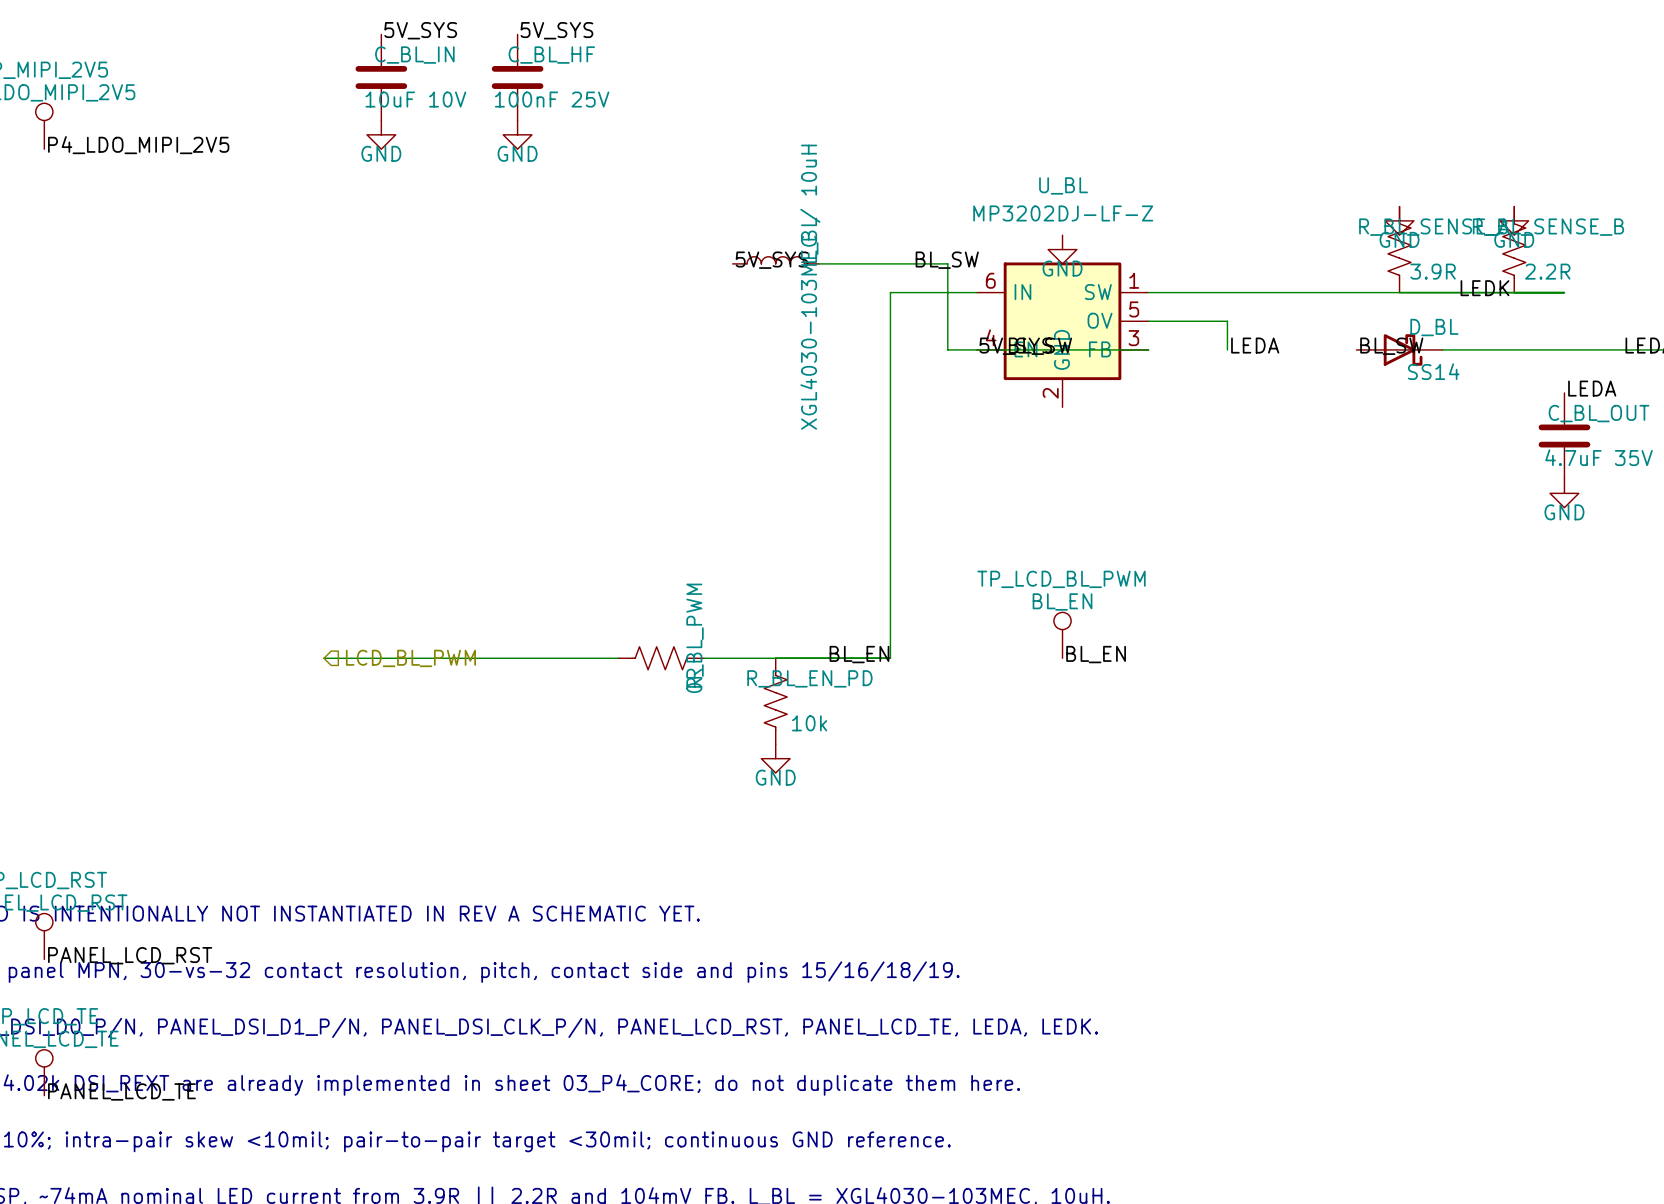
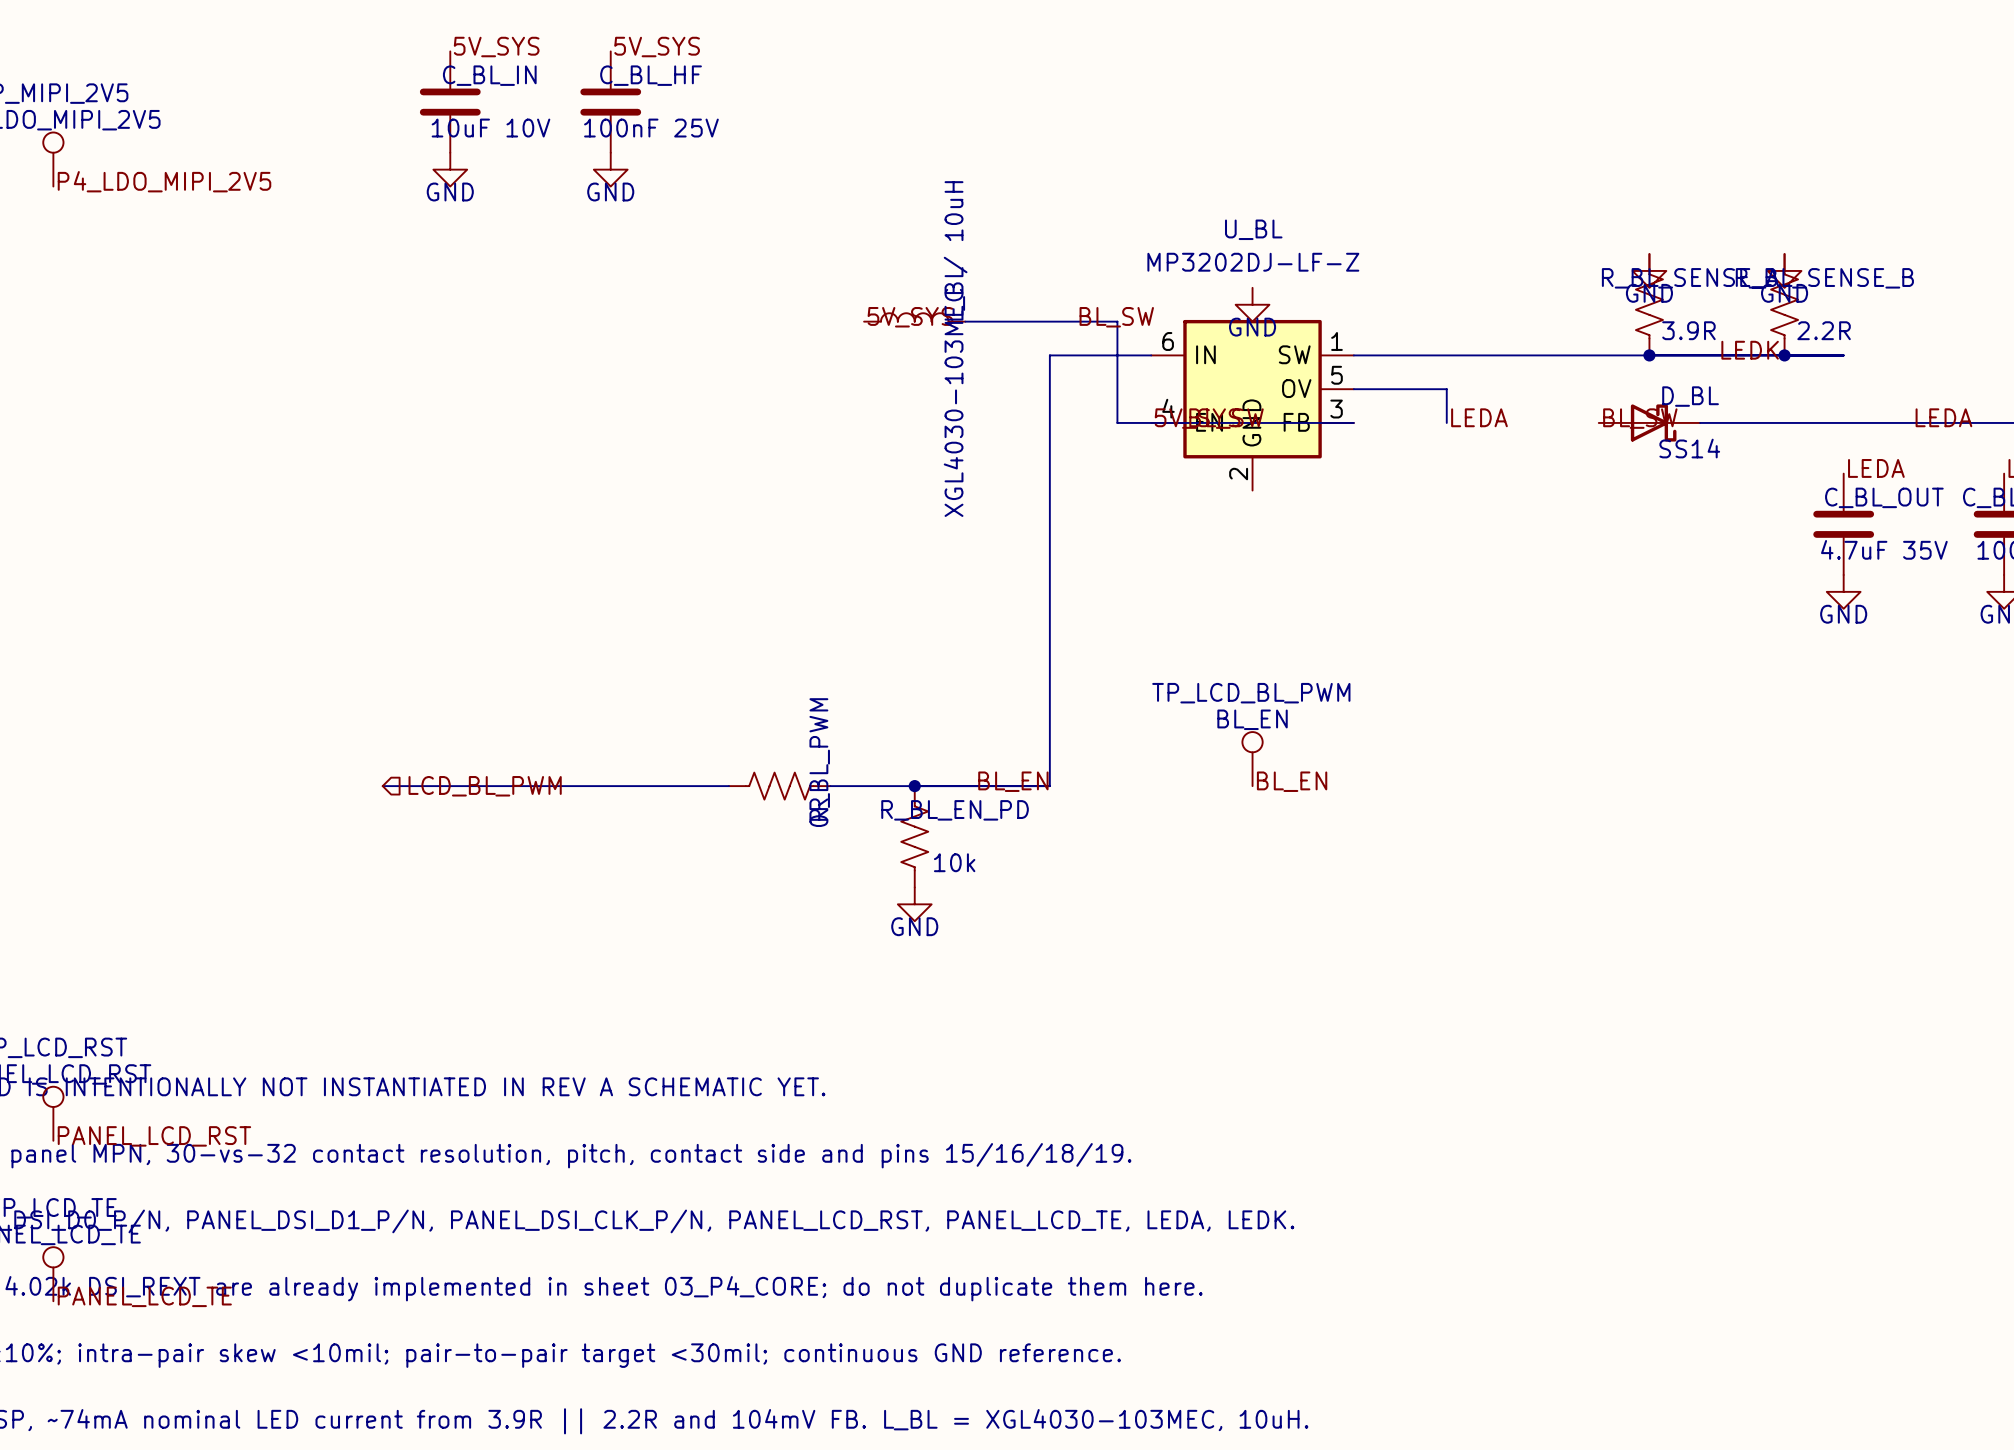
junction: none -> (1649, 355)
junction: none -> (1784, 355)
junction: none -> (914, 786)

